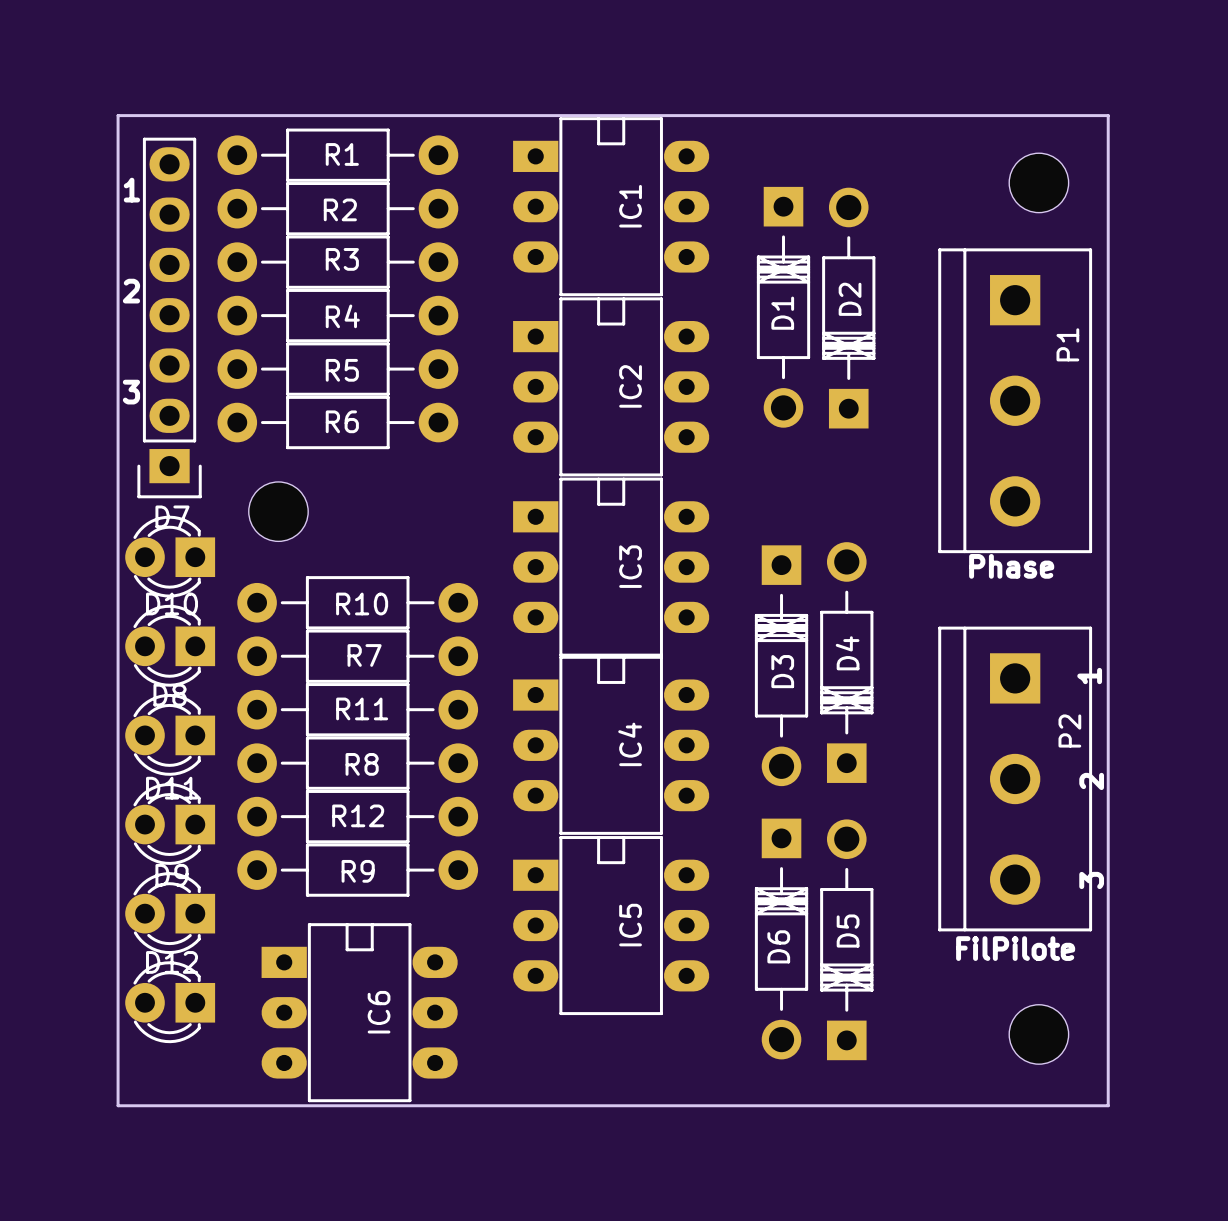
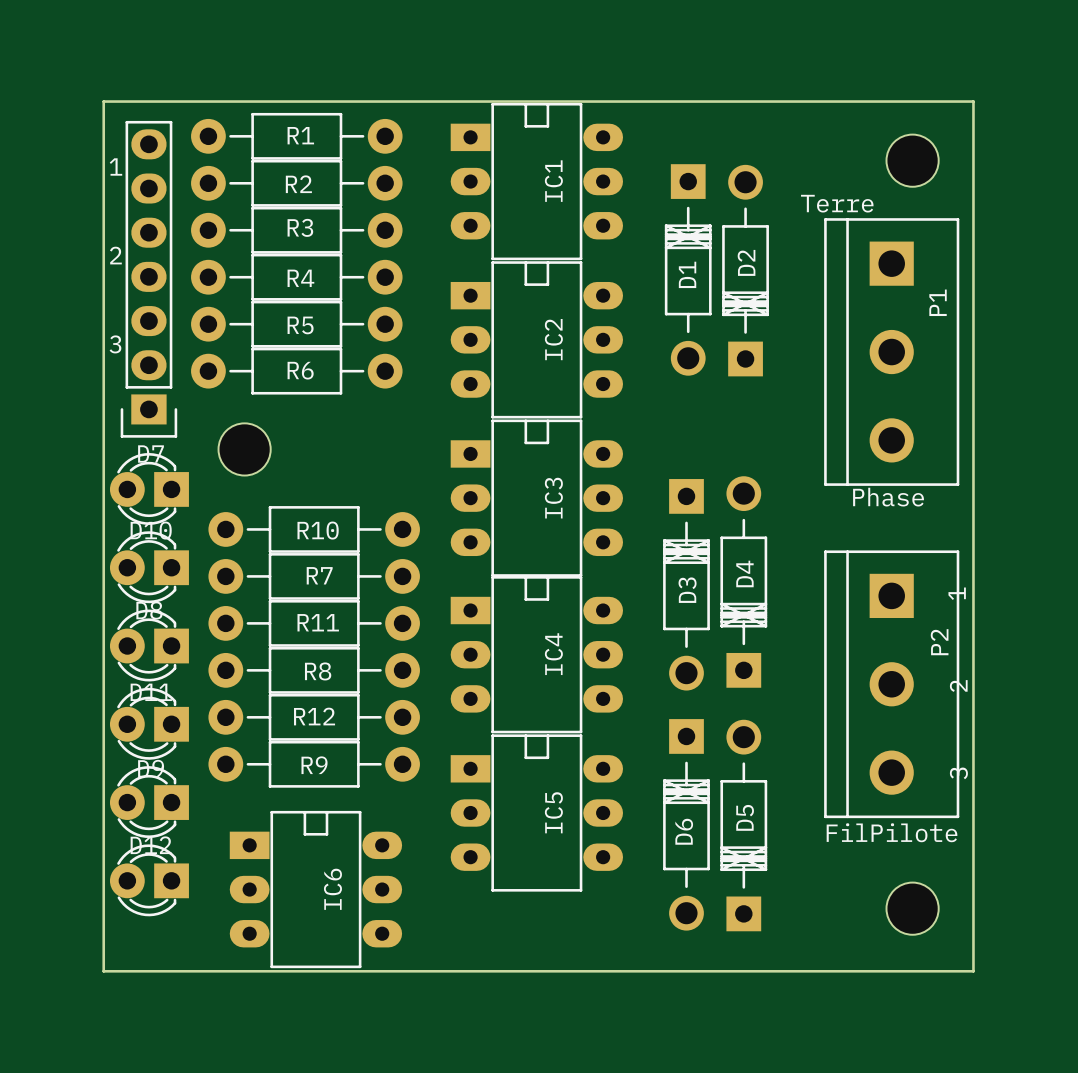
text: none -> Terre (837, 203)

